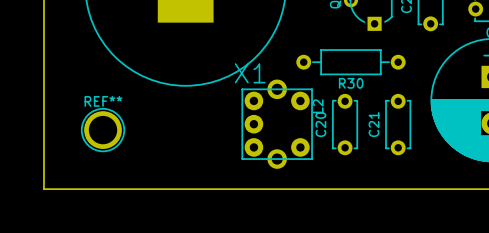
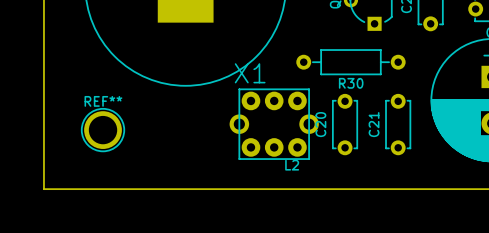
L2 footprint: [241, 79, 313, 169] -> [229, 88, 319, 160]
L2 name position: L2 (318, 106) -> L2 (292, 165)

